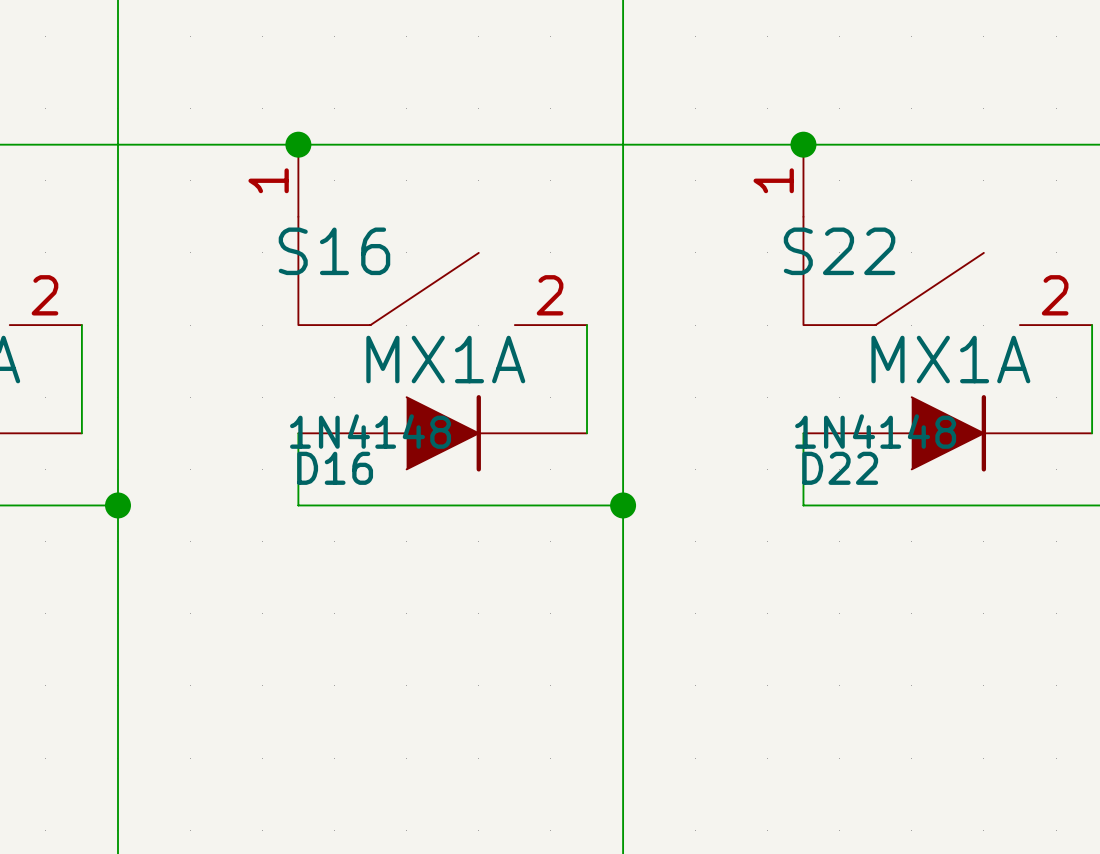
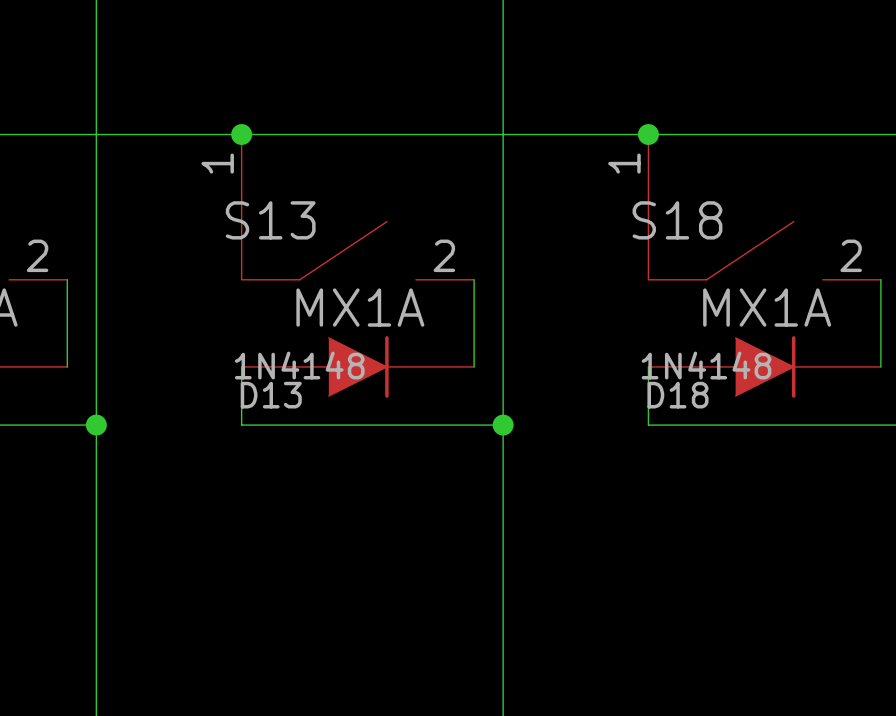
S16 name: S16 (334, 251) -> S13 (270, 220)
S22 name: S22 (839, 251) -> S18 (677, 220)
D16 name: D16 (335, 468) -> D13 (271, 395)
D22 name: D22 (840, 468) -> D18 (678, 395)

